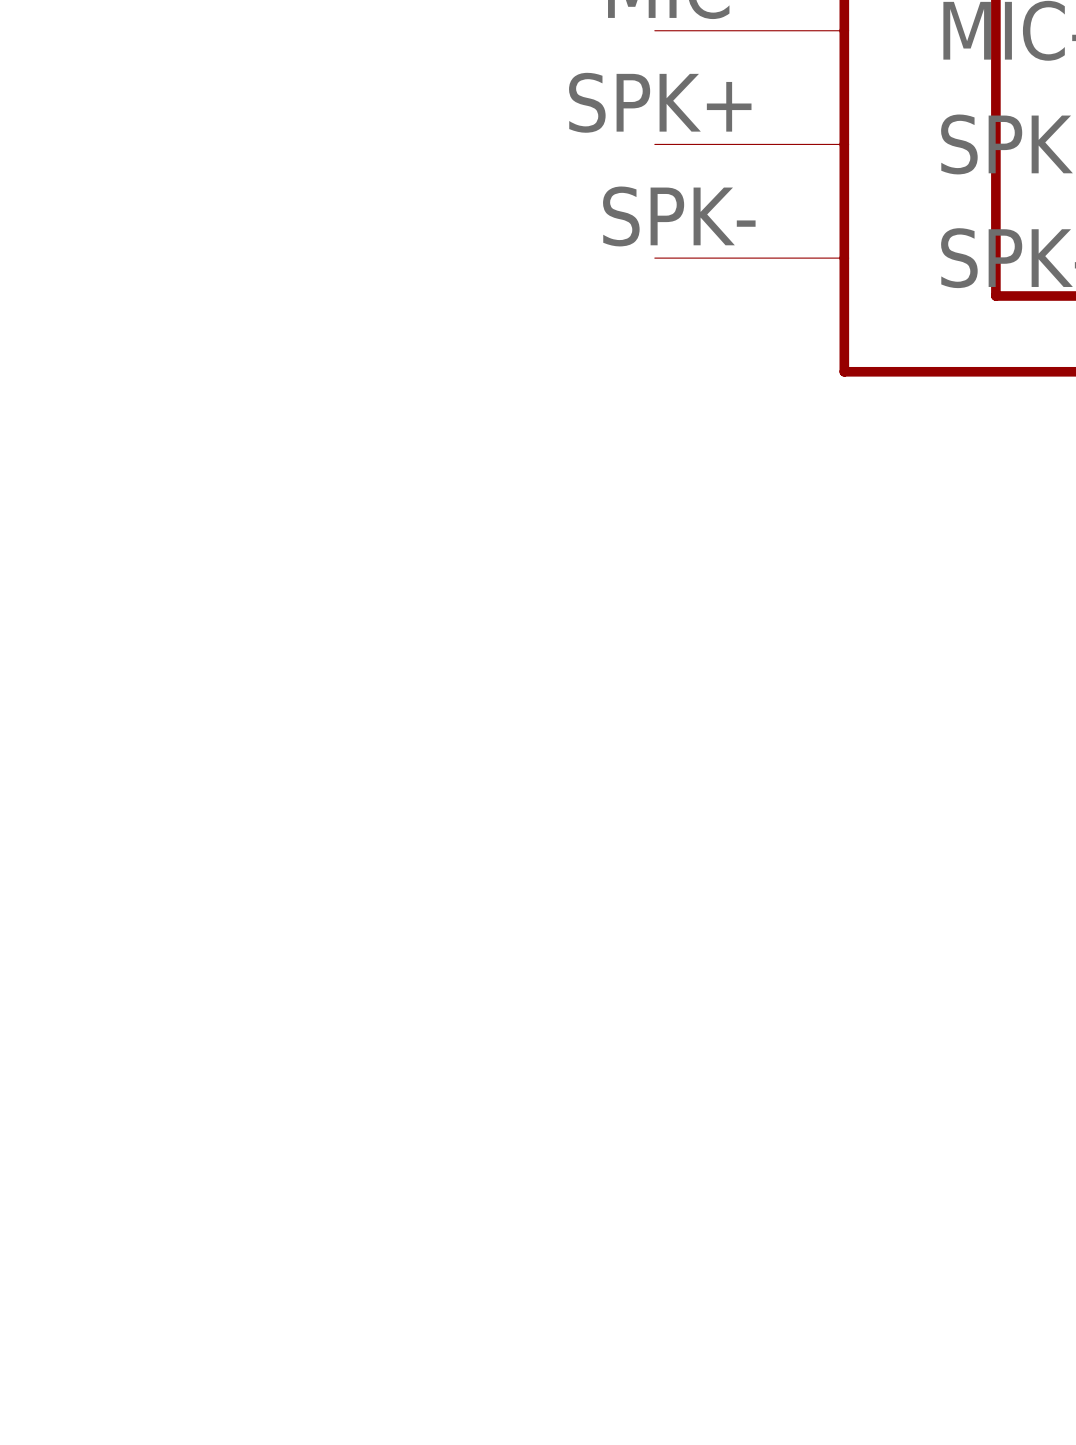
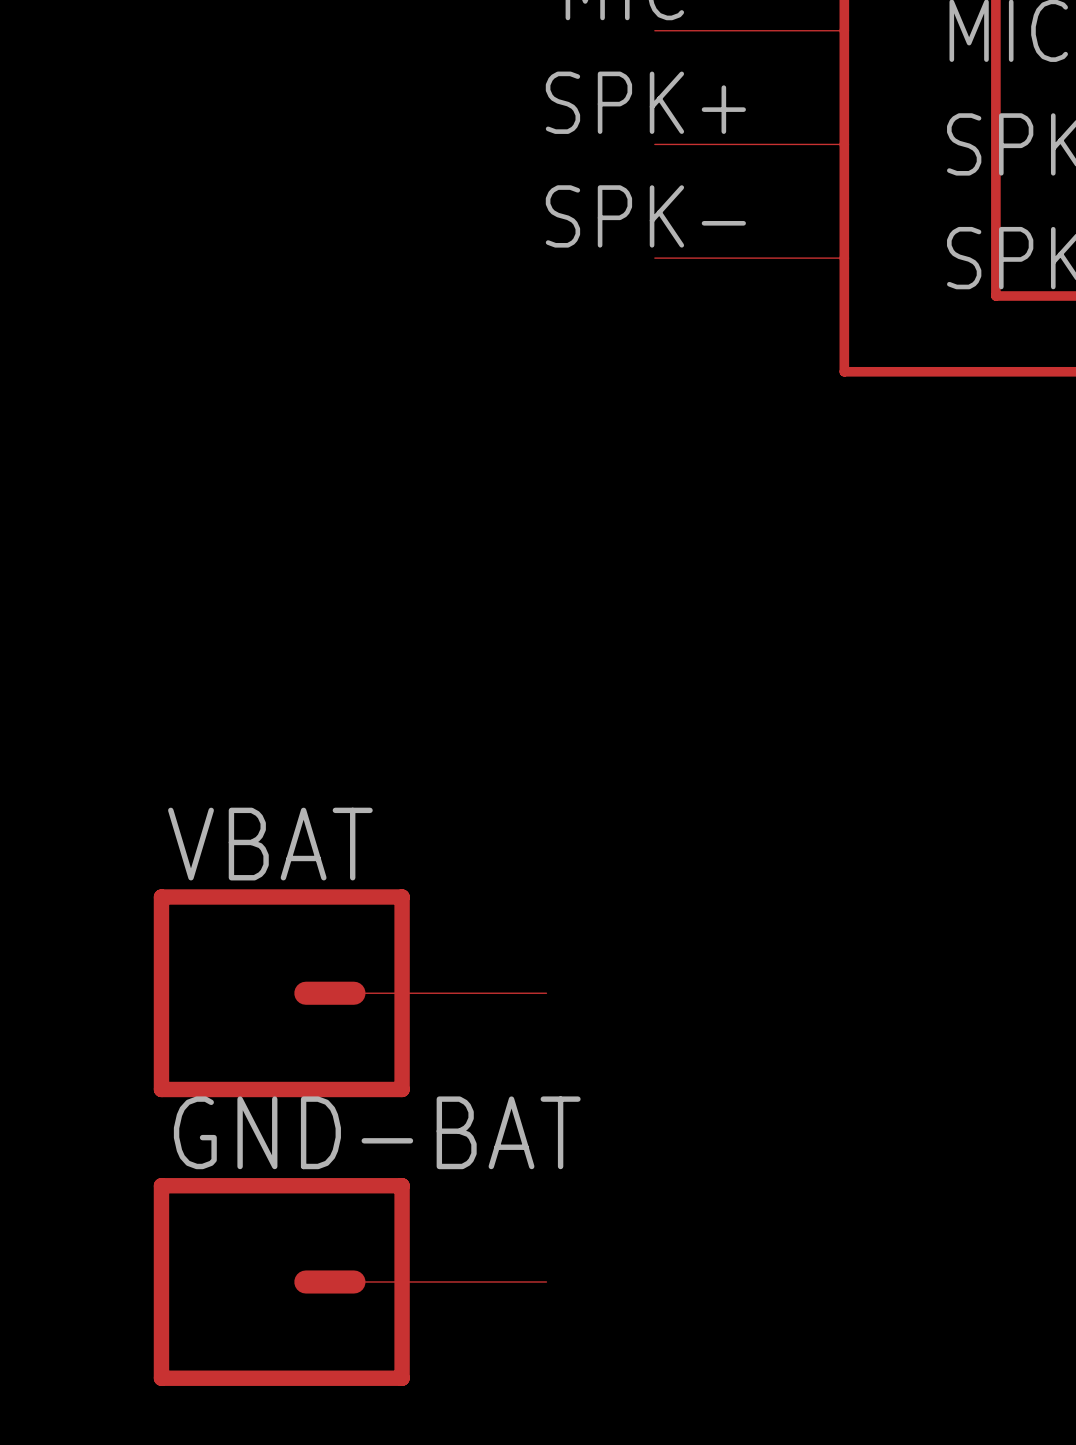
VBAT: none -> (350, 993)
GND-BAT: none -> (350, 1281)

